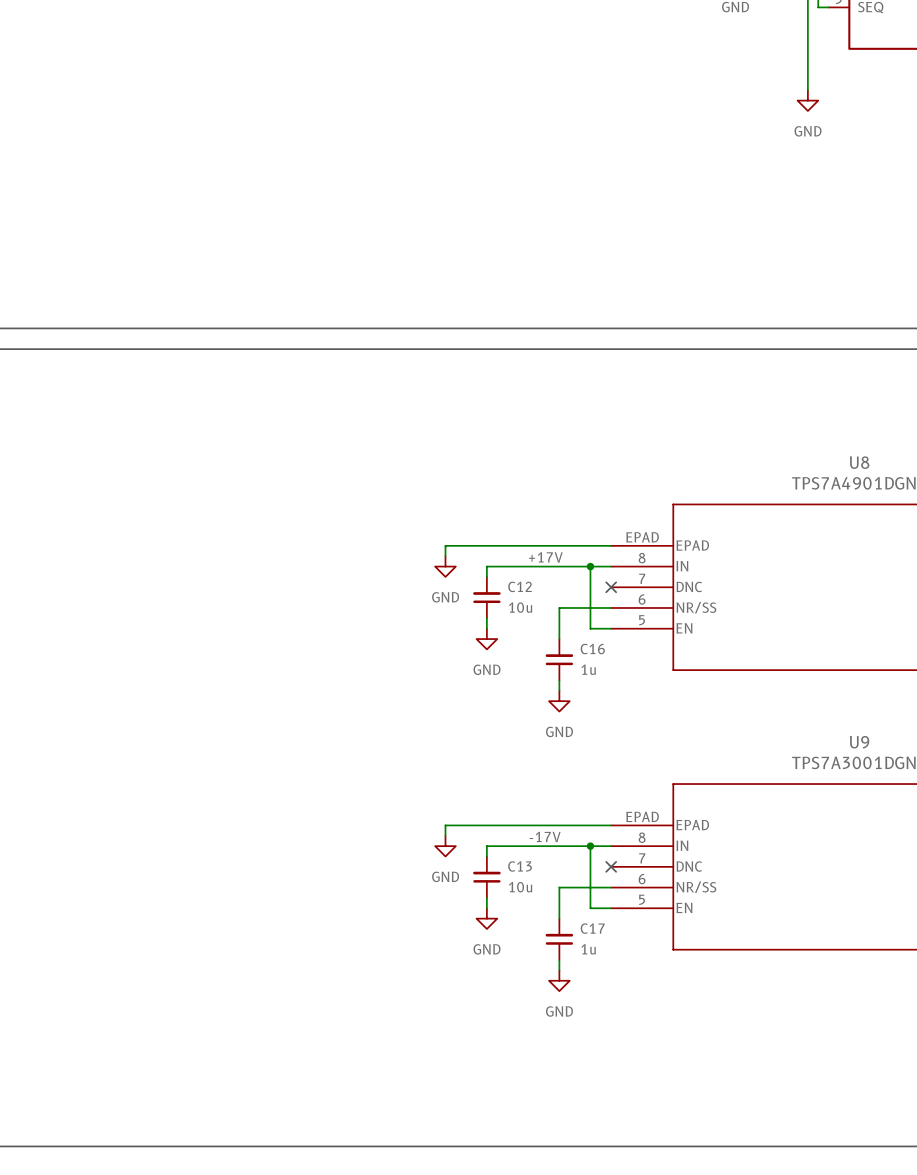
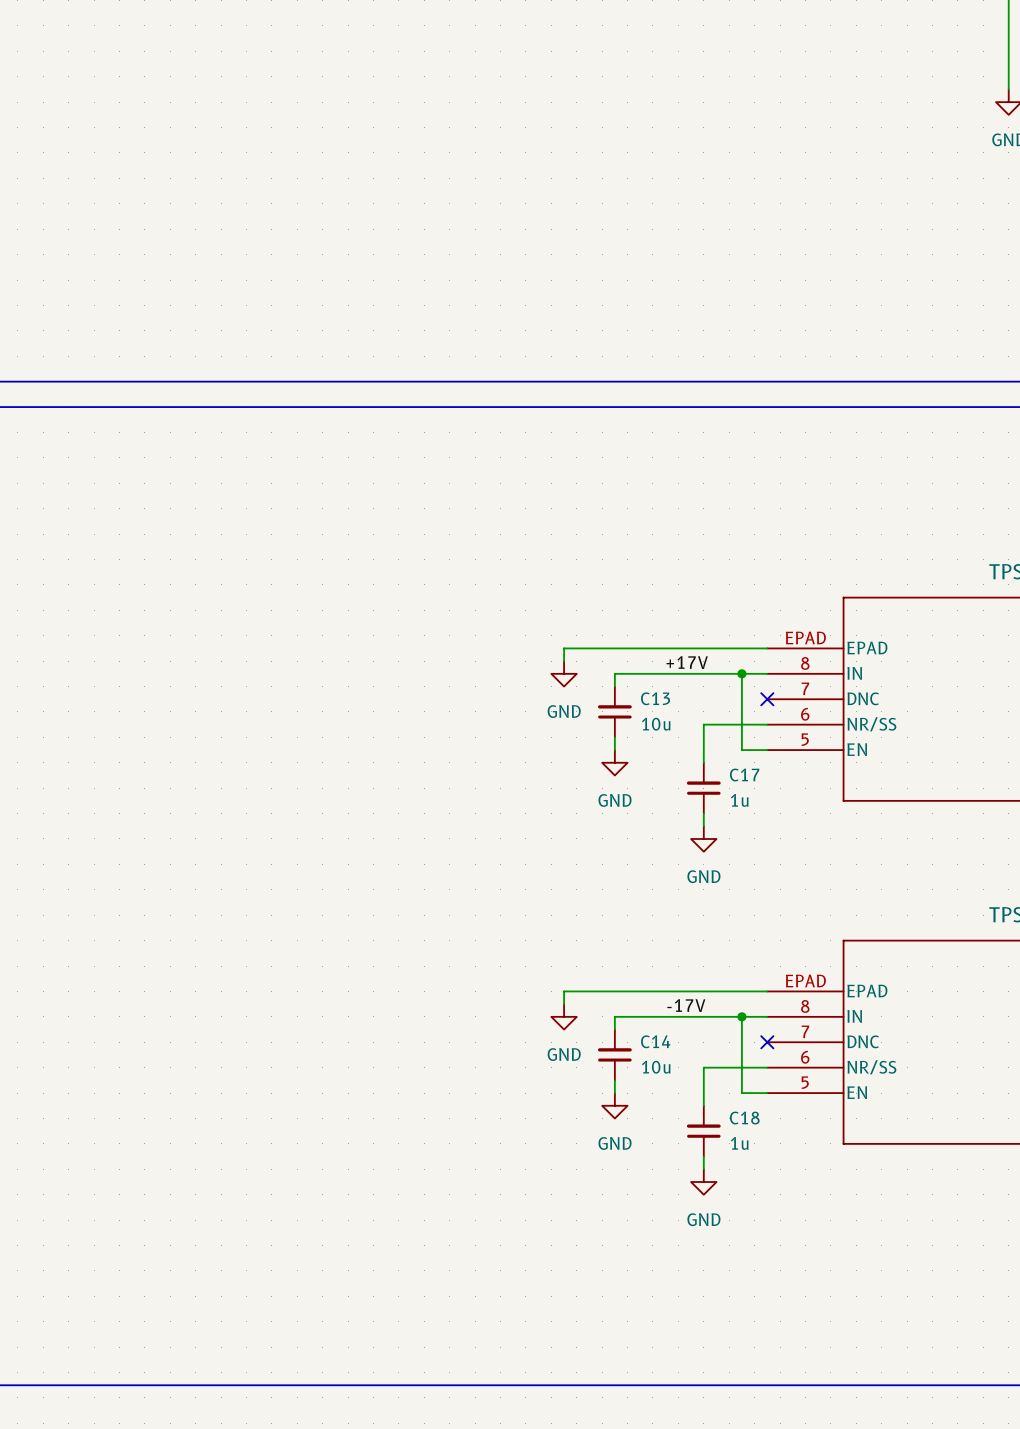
C12 name: C12 (520, 586) -> C13 (655, 698)
C16 name: C16 (592, 649) -> C17 (744, 775)
C13 name: C13 (520, 866) -> C14 (655, 1041)
C17 name: C17 (592, 928) -> C18 (744, 1118)

